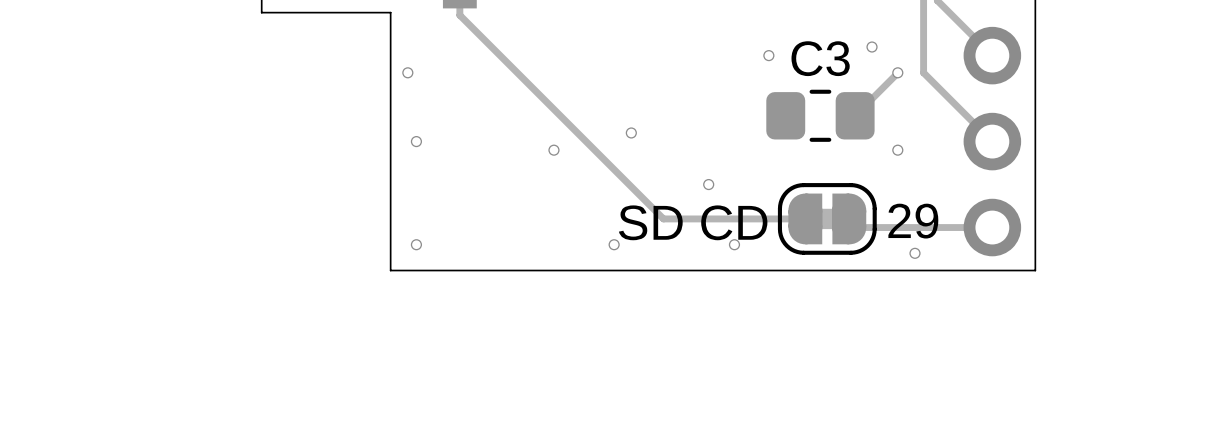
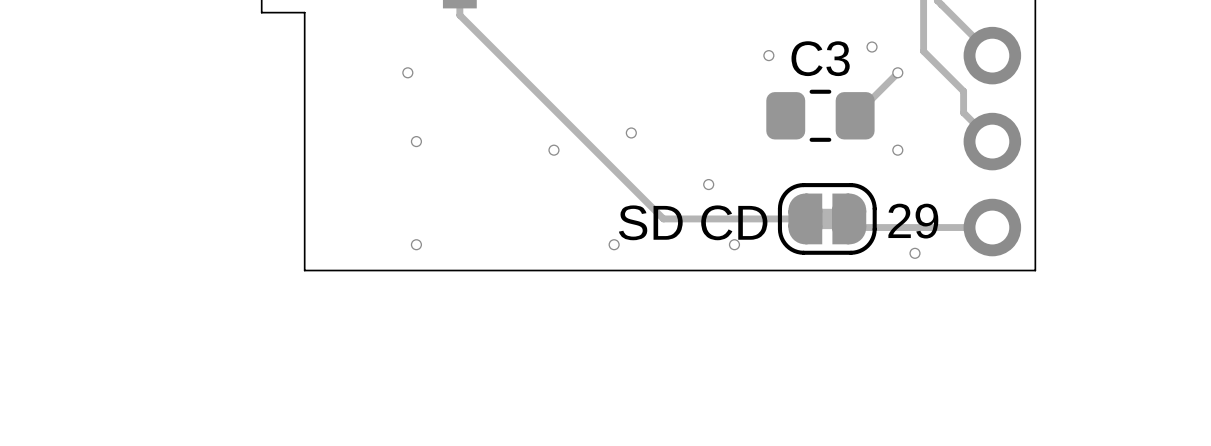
board edge: (304, 12) (390, 12) (390, 270) -> (304, 12) (304, 270) (390, 270)
track: (923, 51) (923, 72) (963, 112) -> (923, 51) (963, 91) (963, 112)

